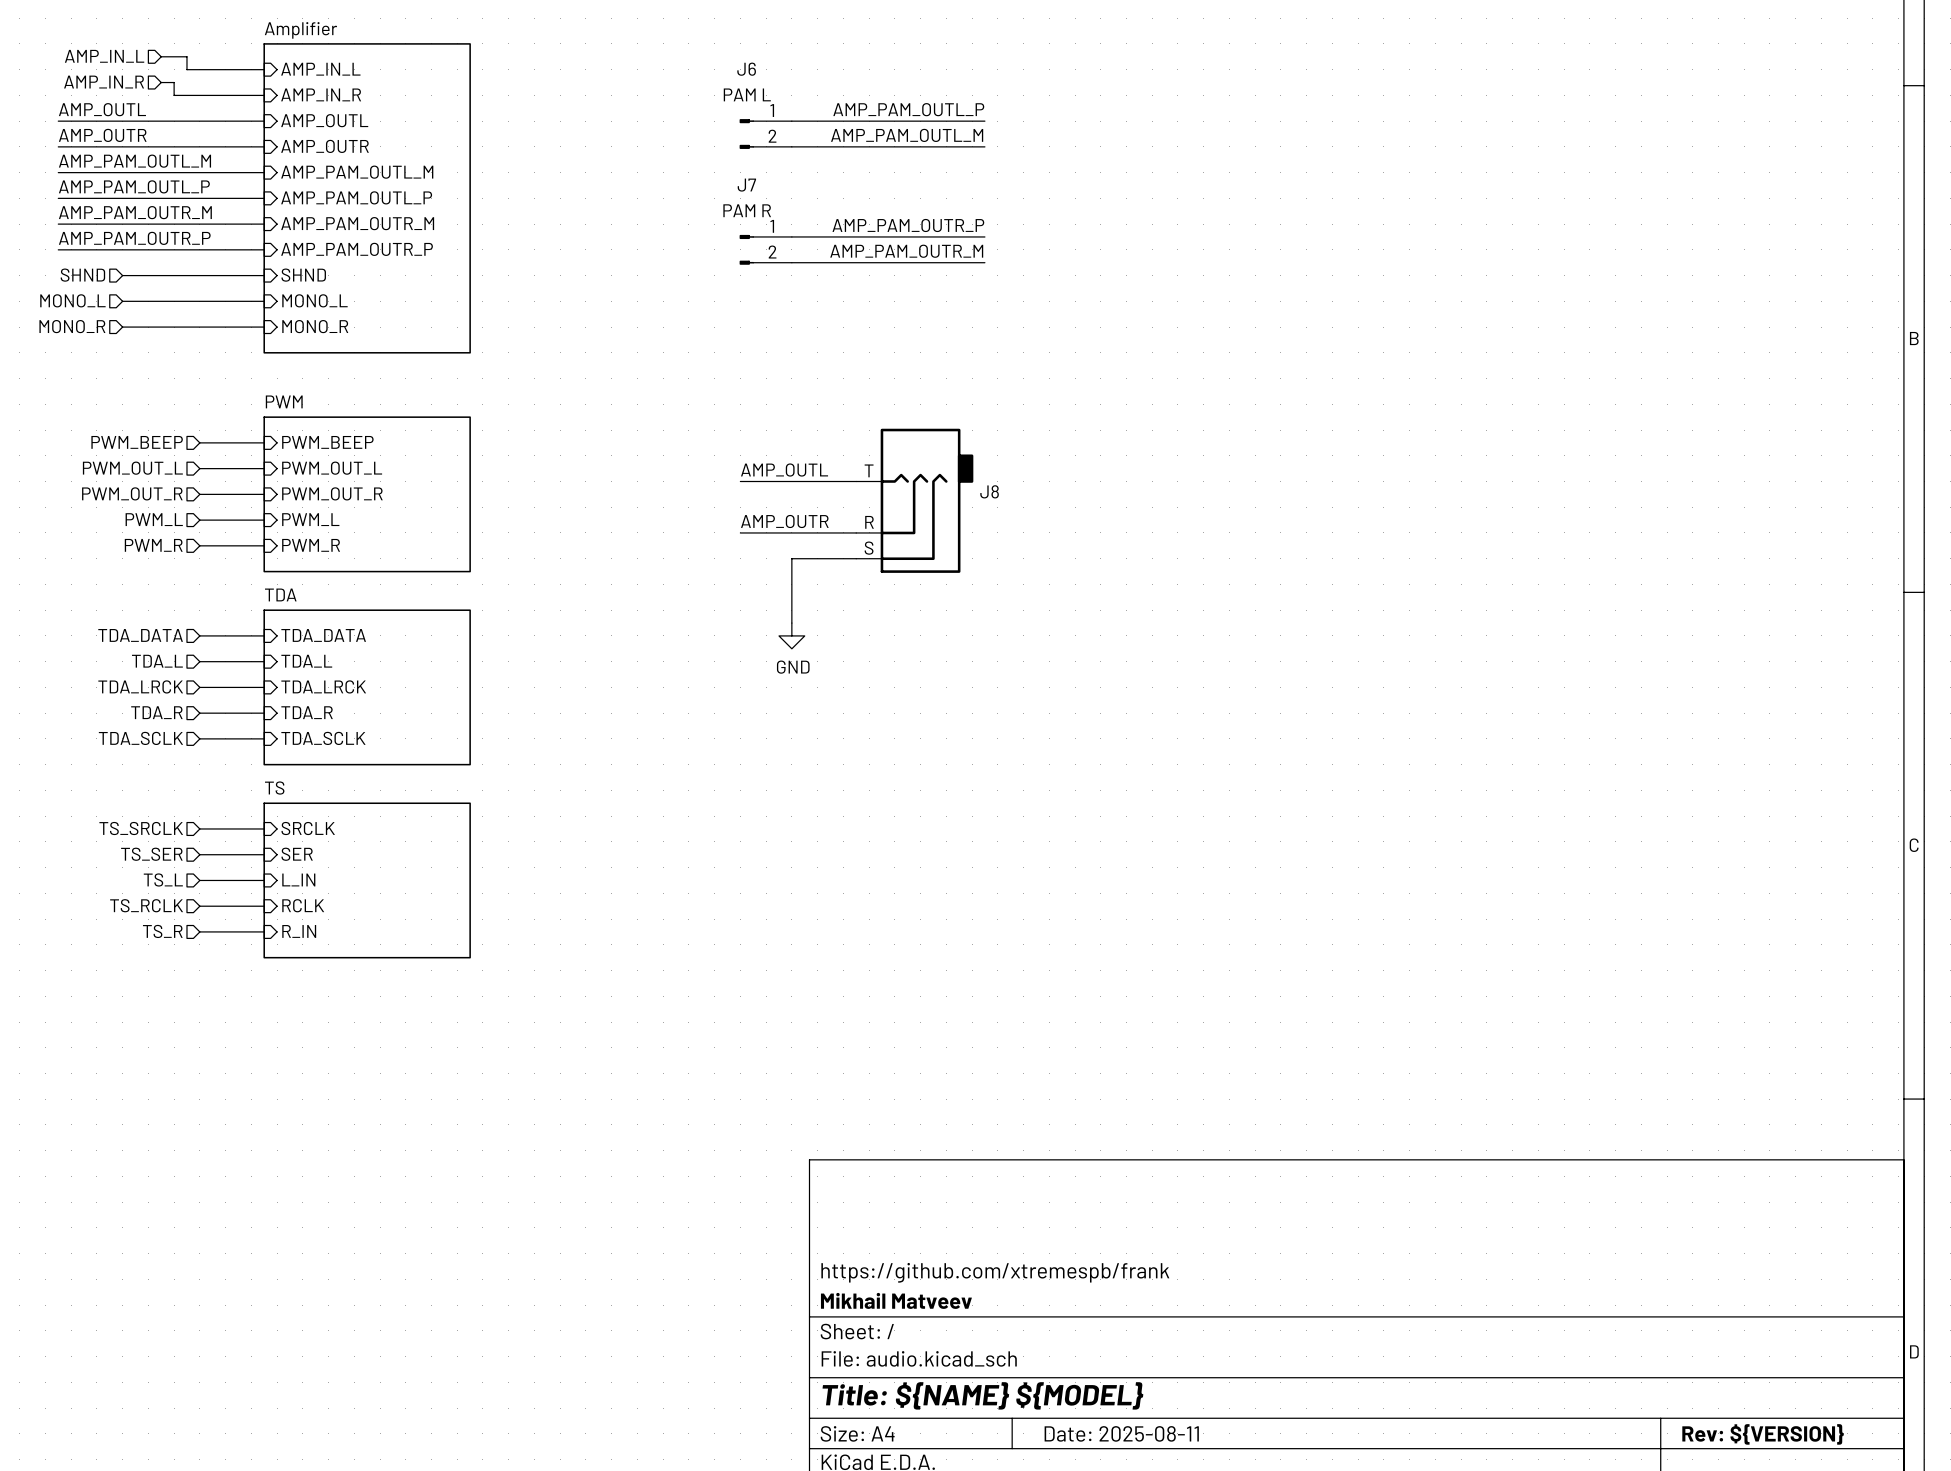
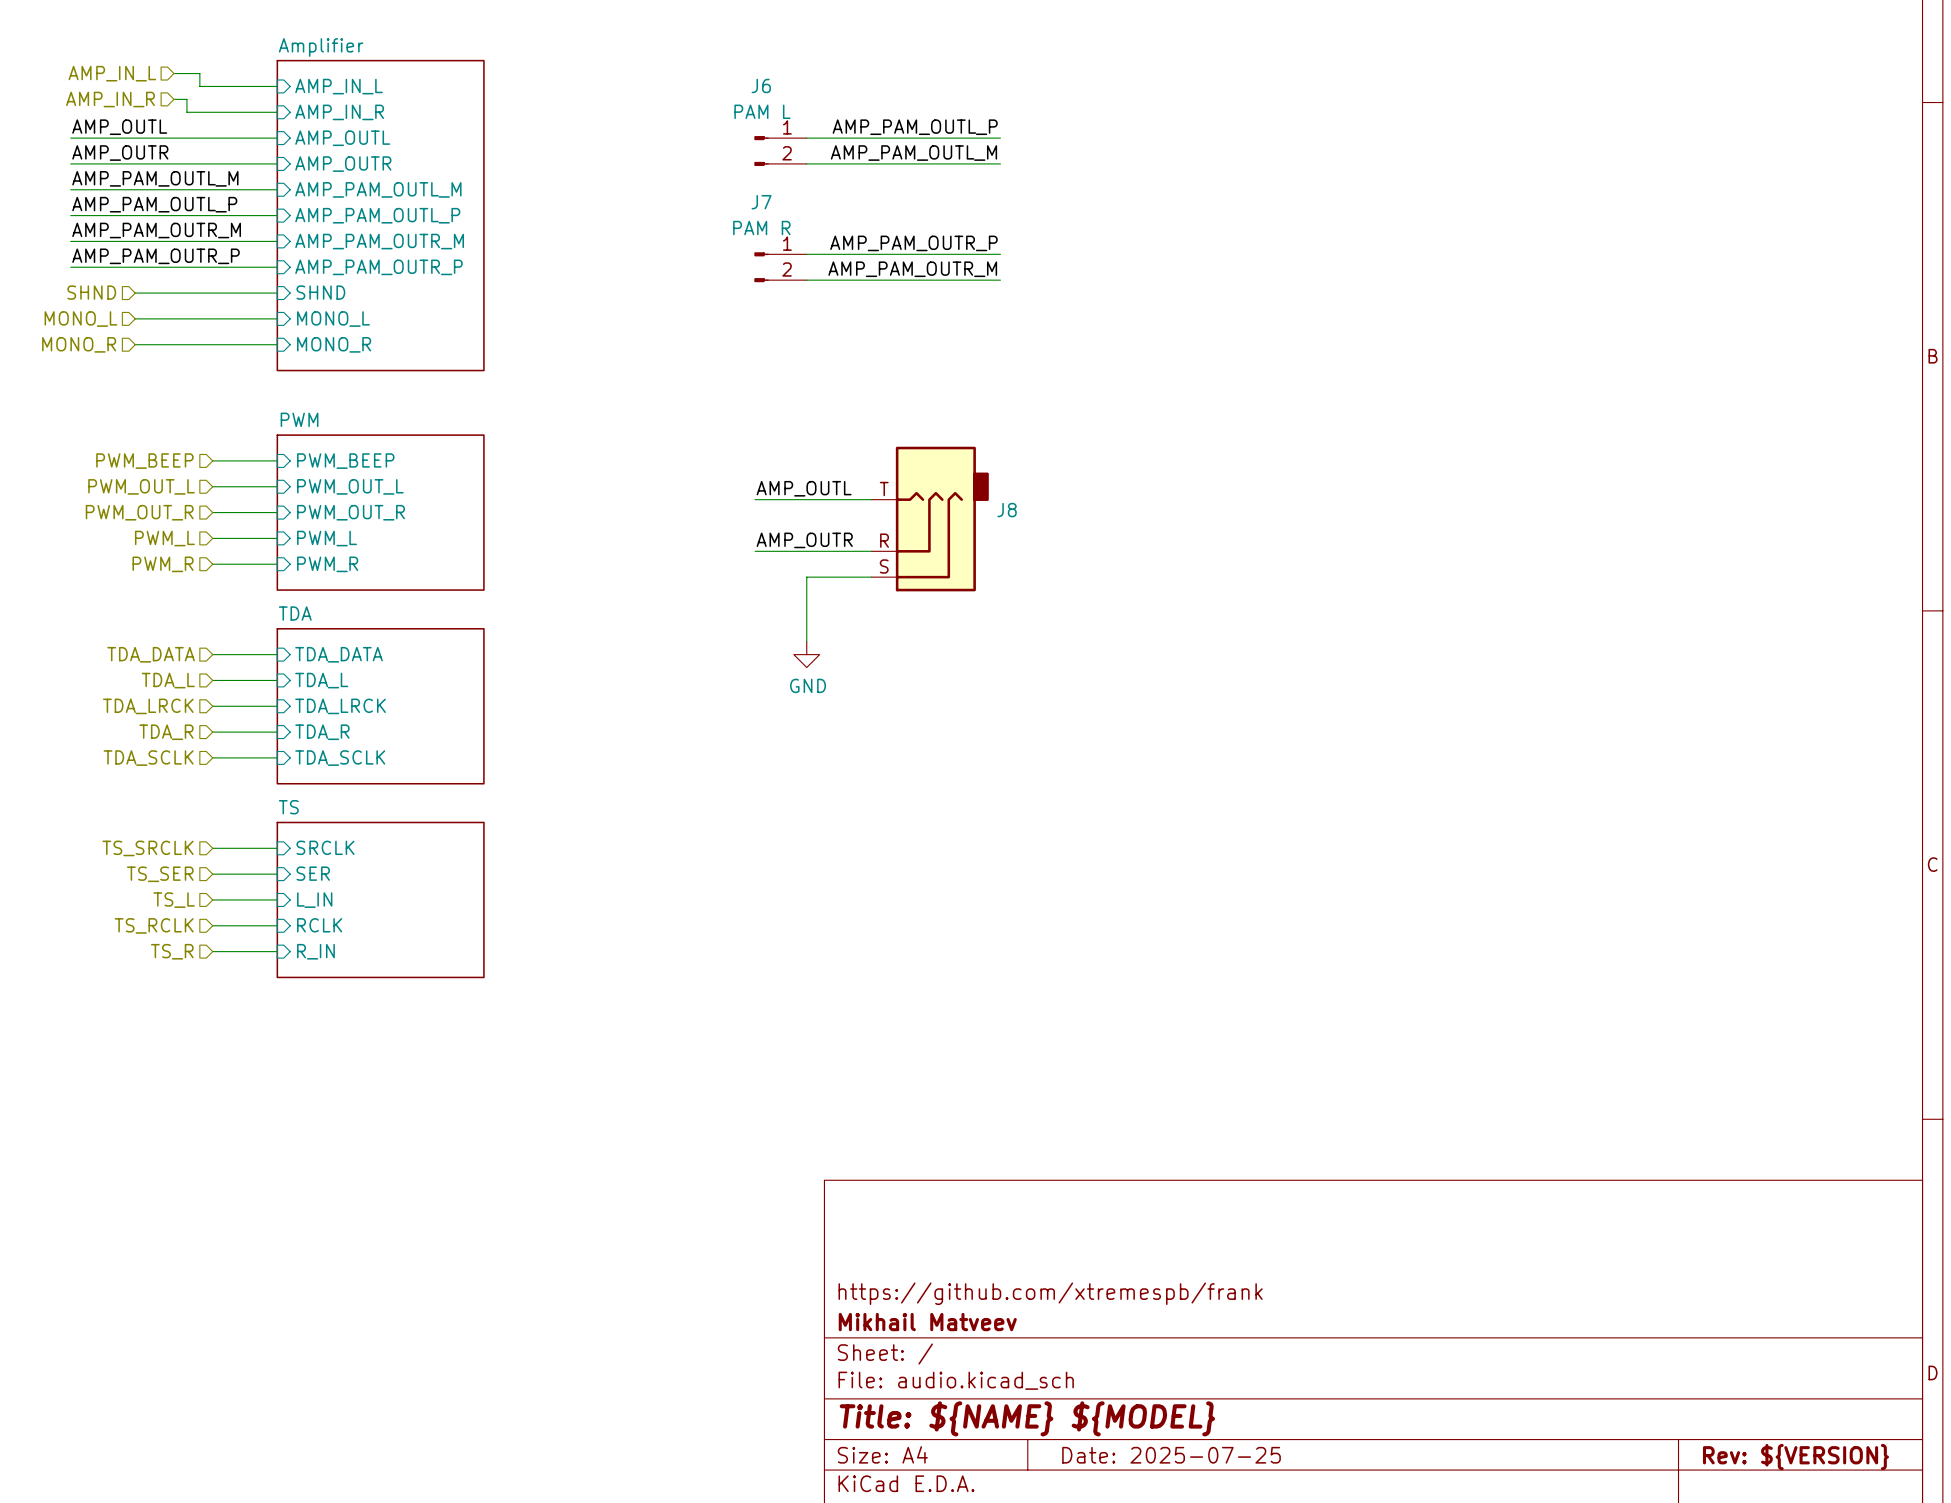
title block: Date: 2025-08-11 (1121, 1433) -> Date: 2025-07-25 (1171, 1455)

